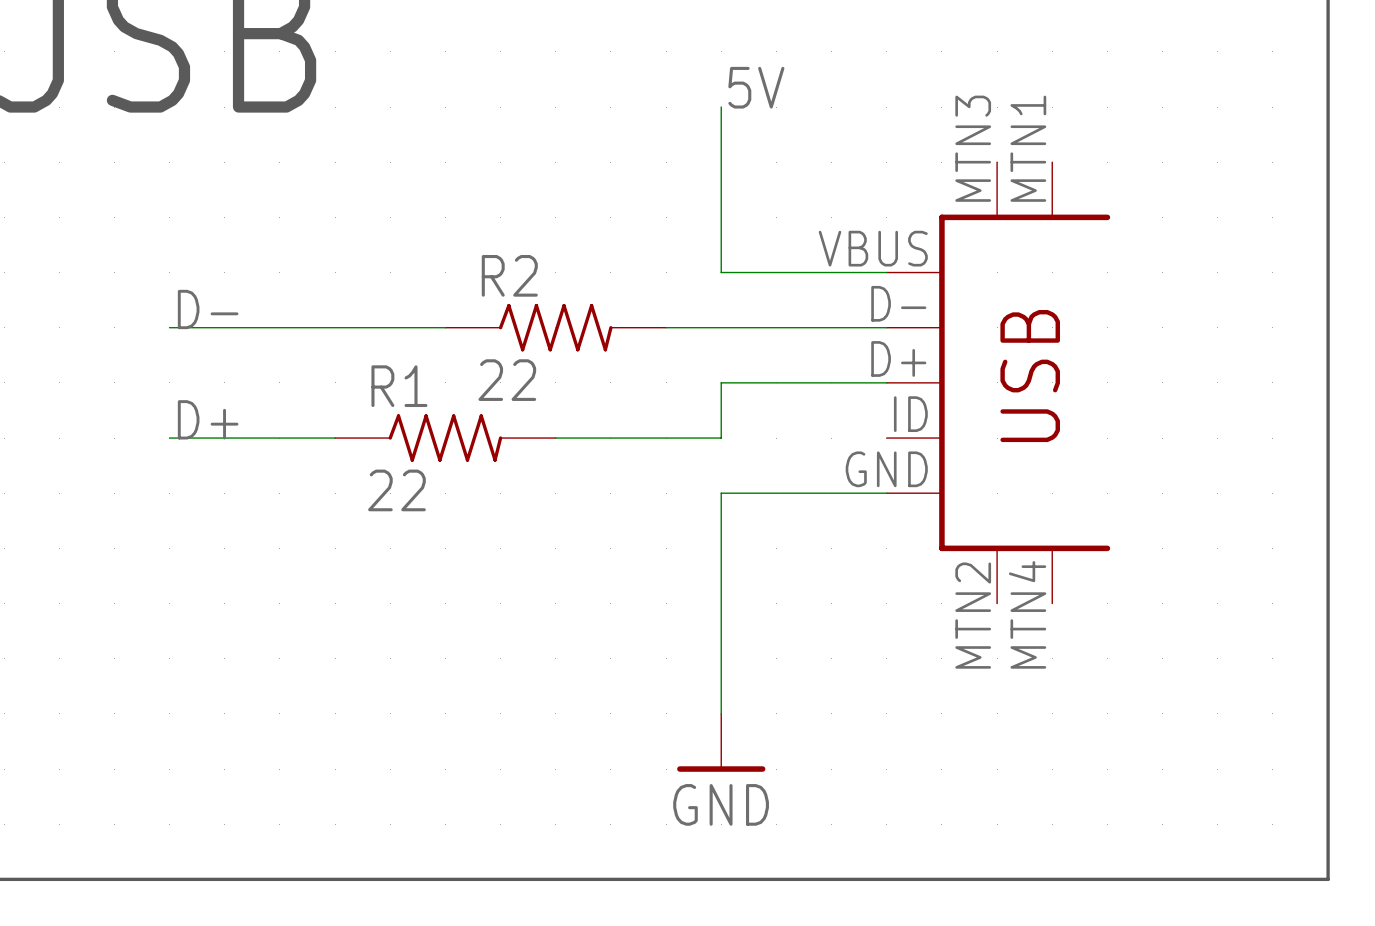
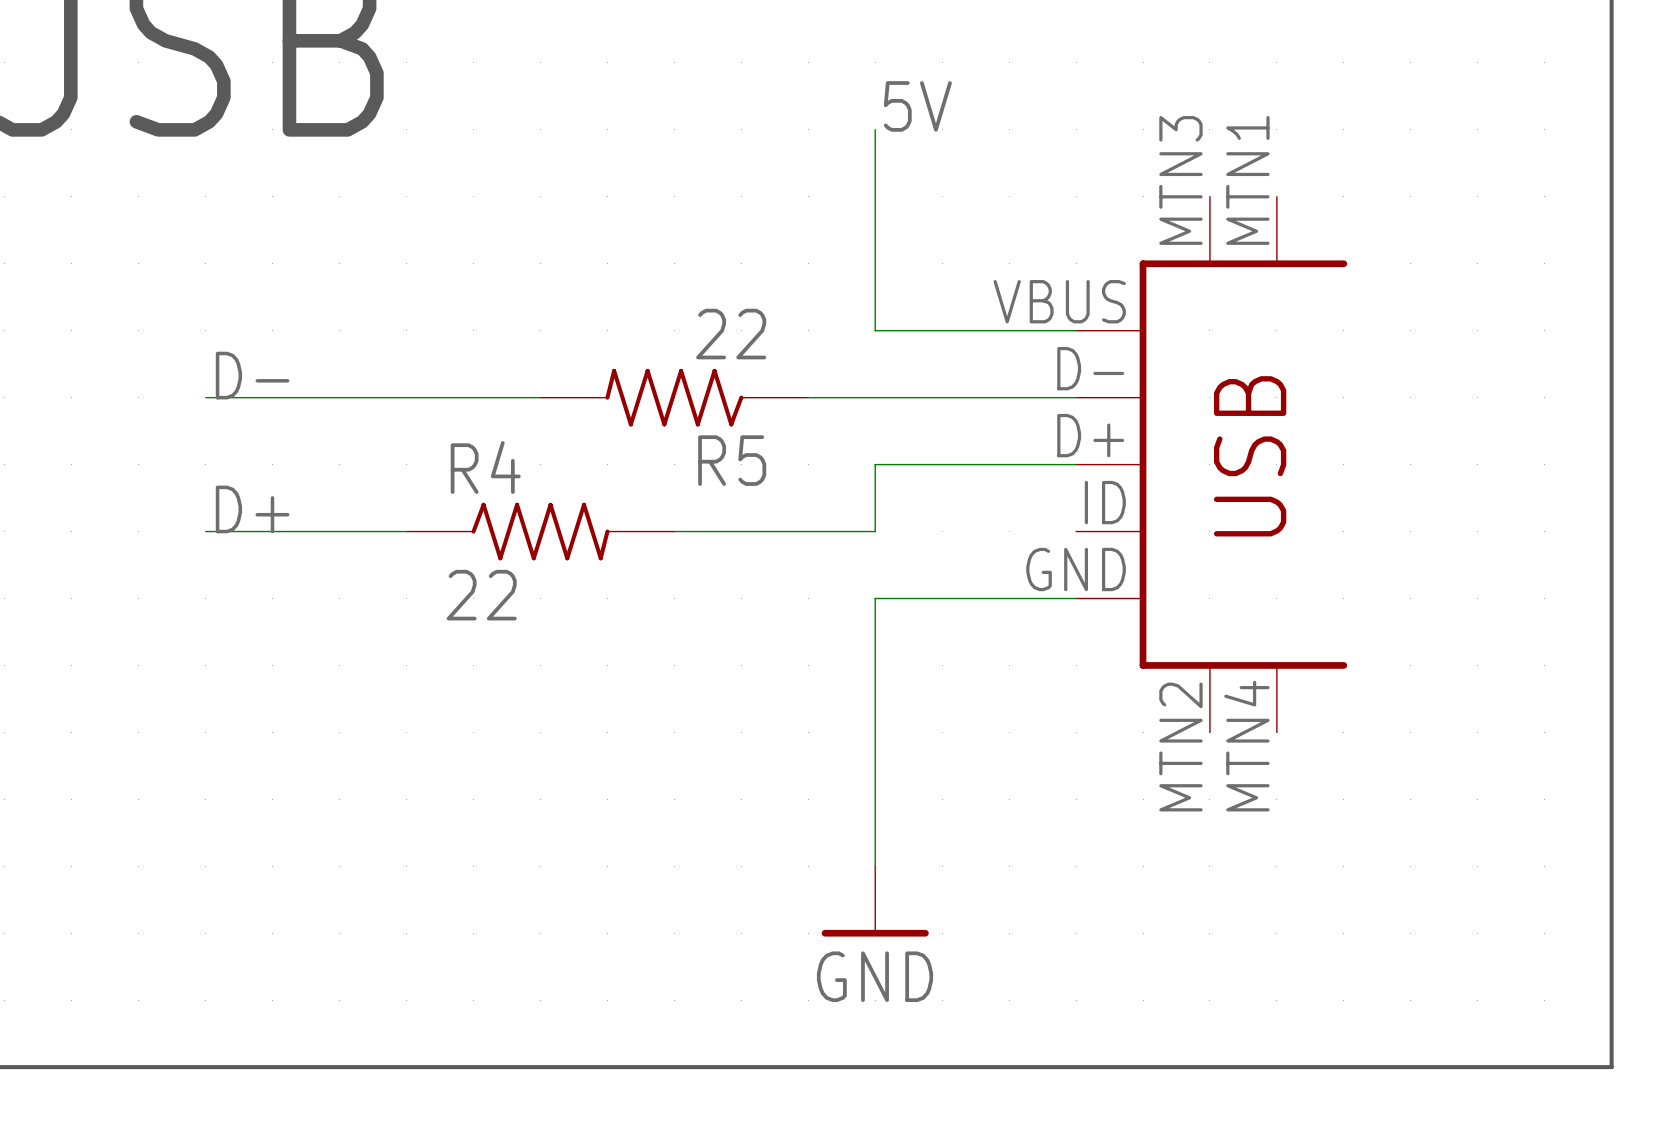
R2: 22 (555, 327) -> none
R5: none -> 22 (674, 397)
R1 name: R1 (399, 386) -> R4 (485, 467)

